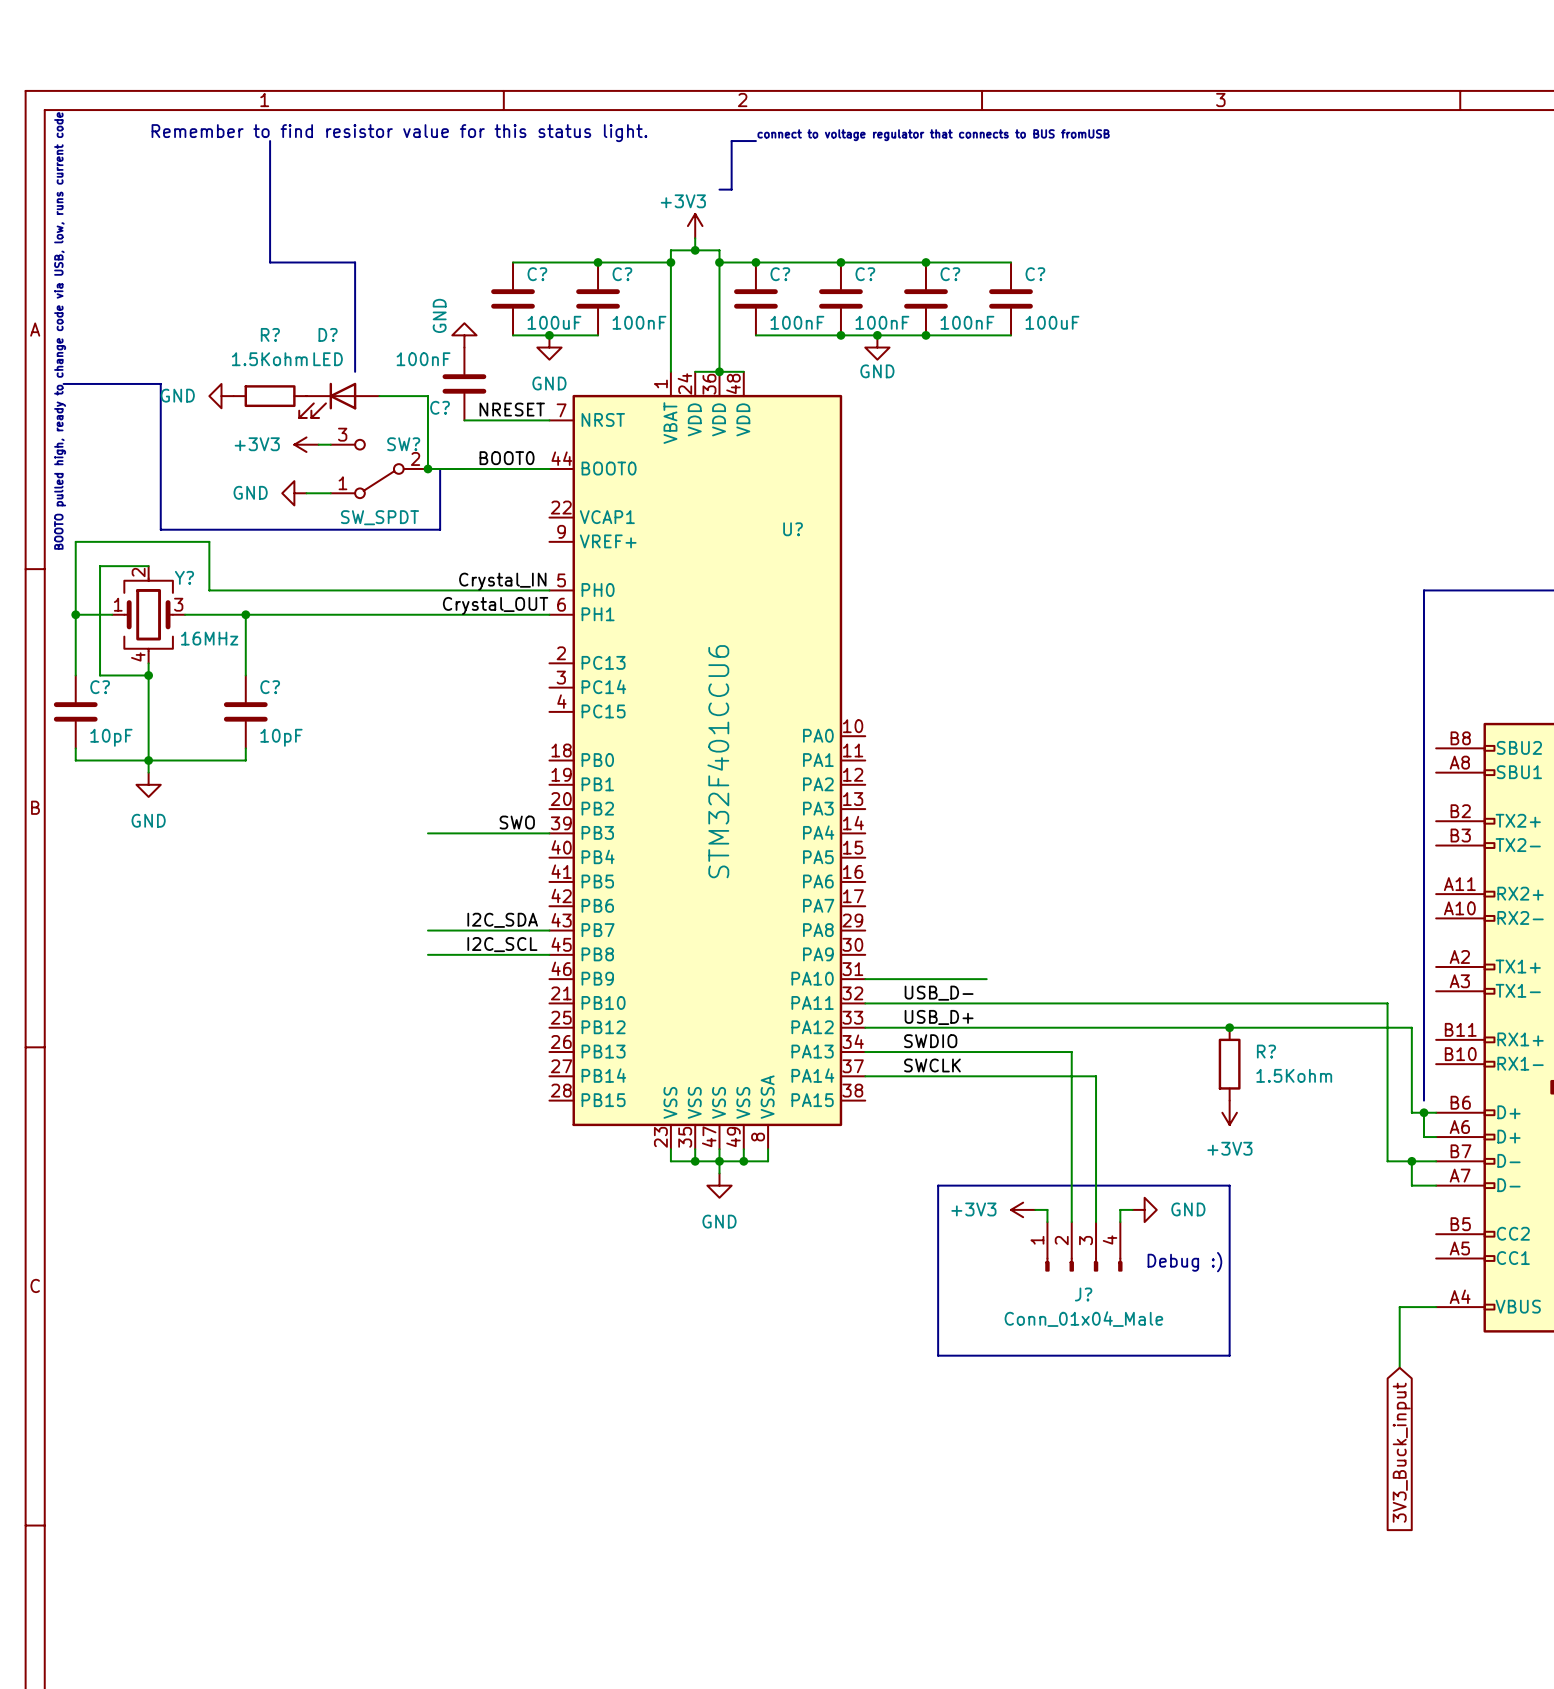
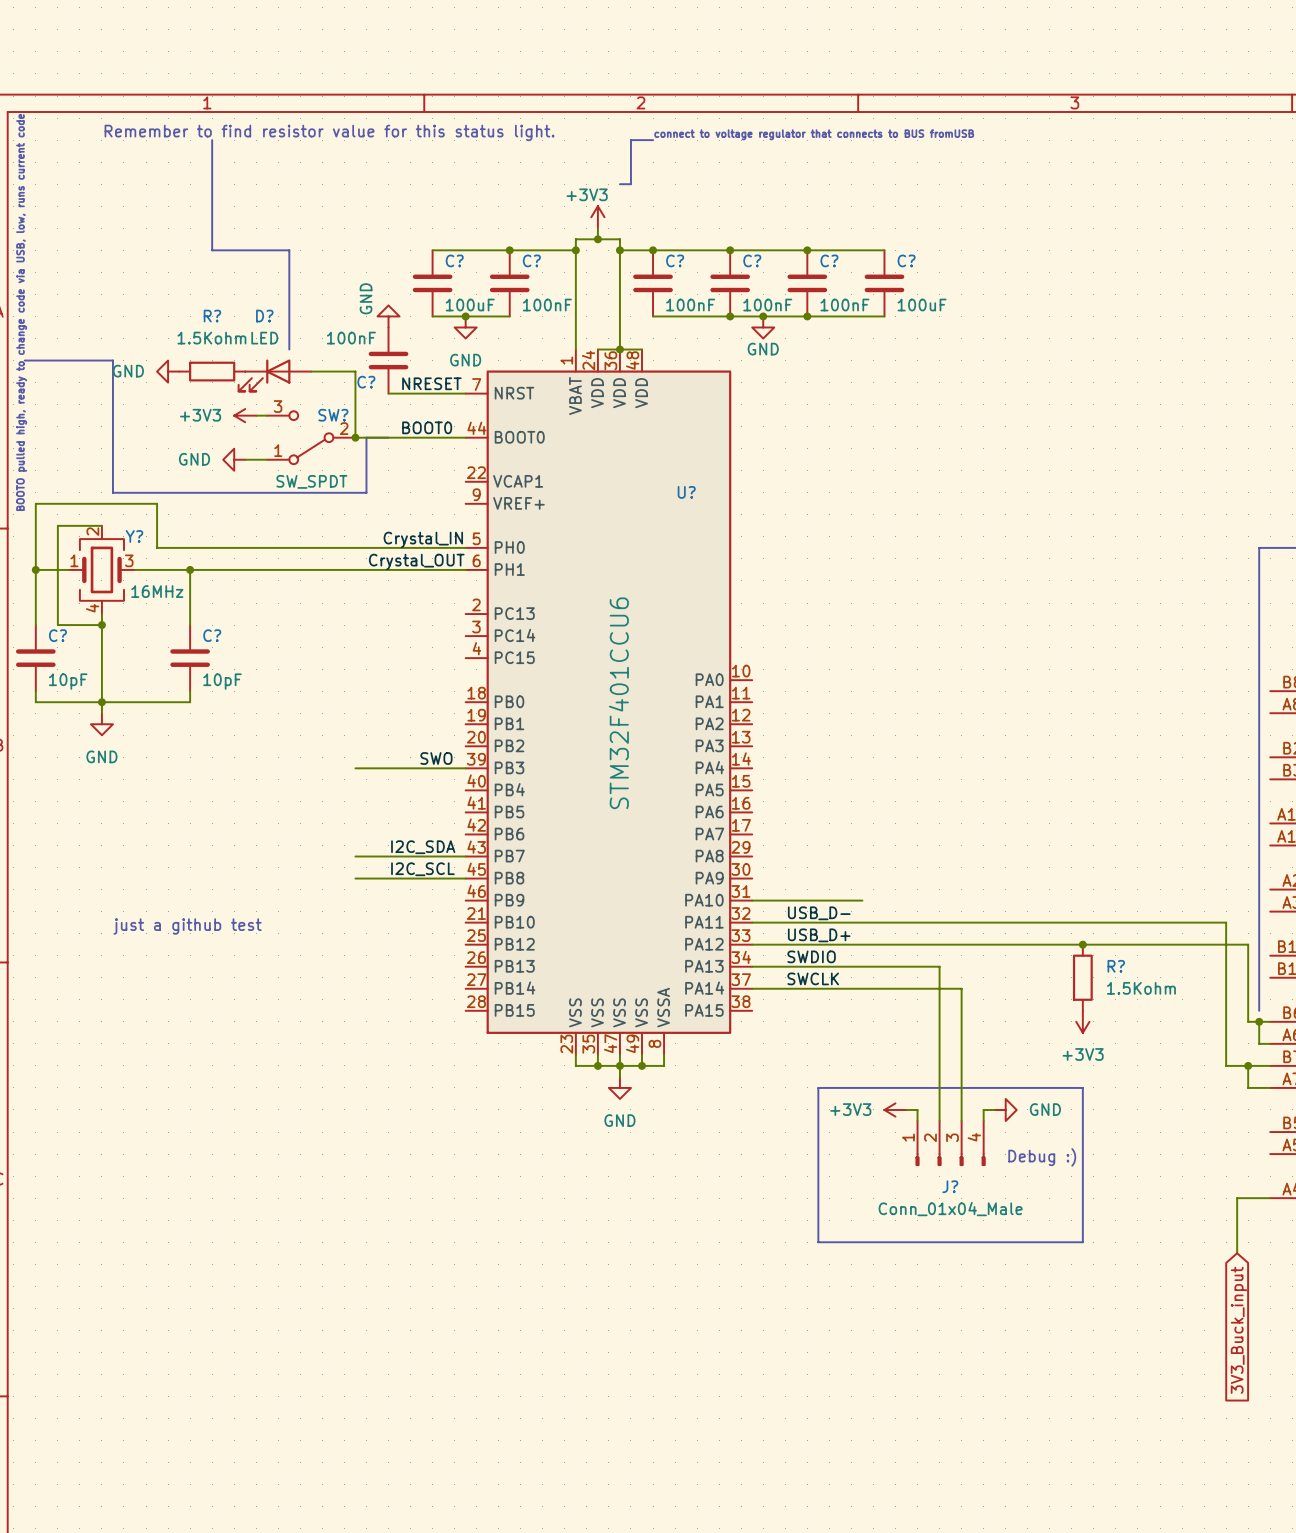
text: none -> just a github test (187, 926)

